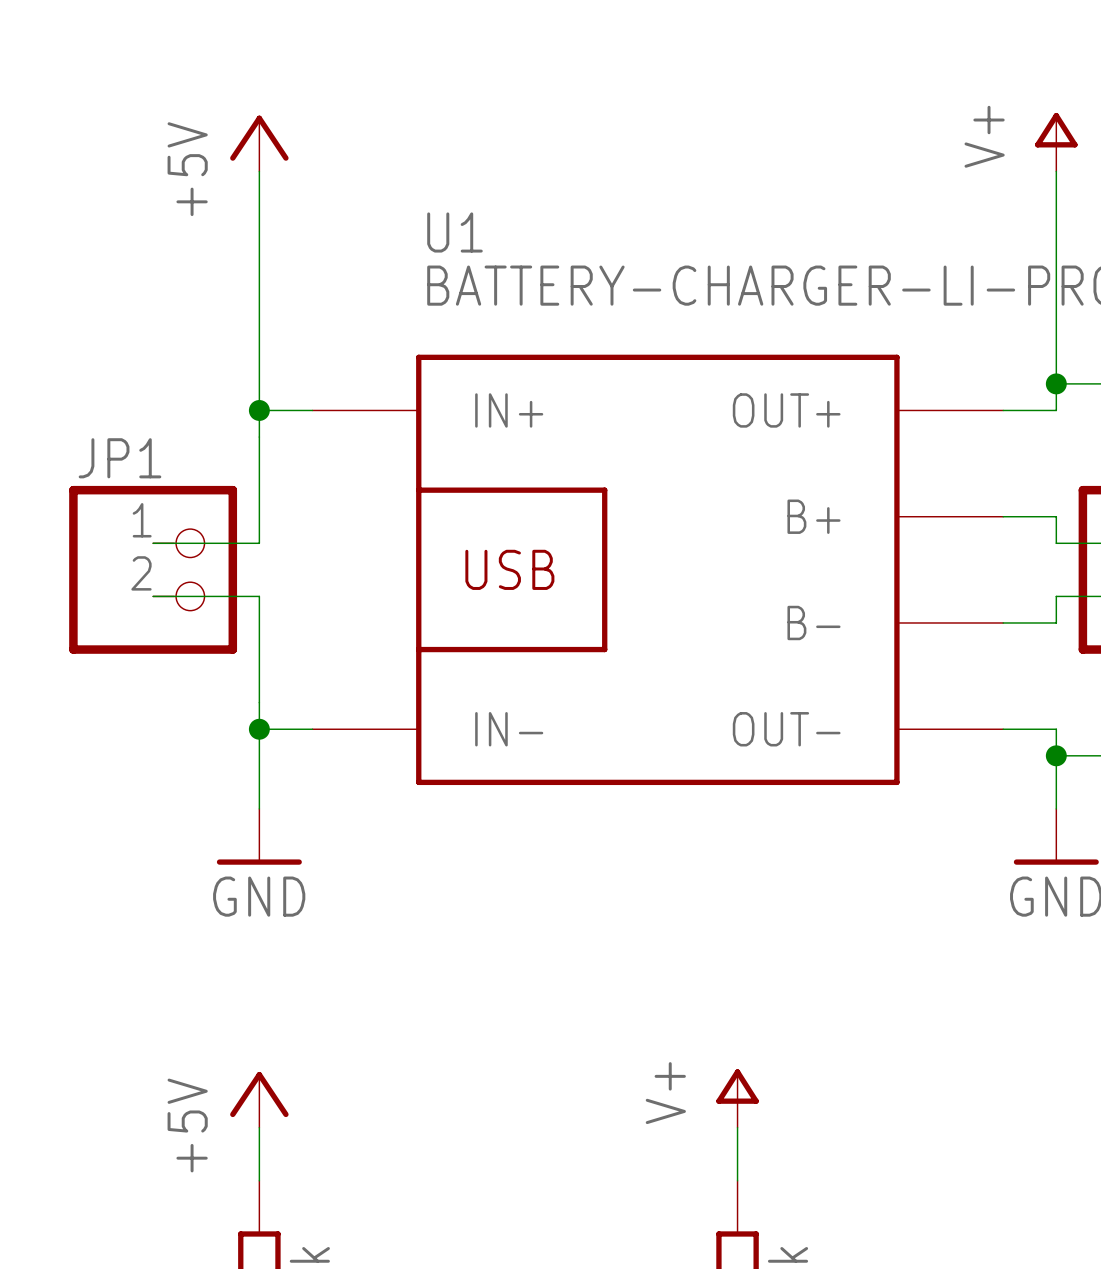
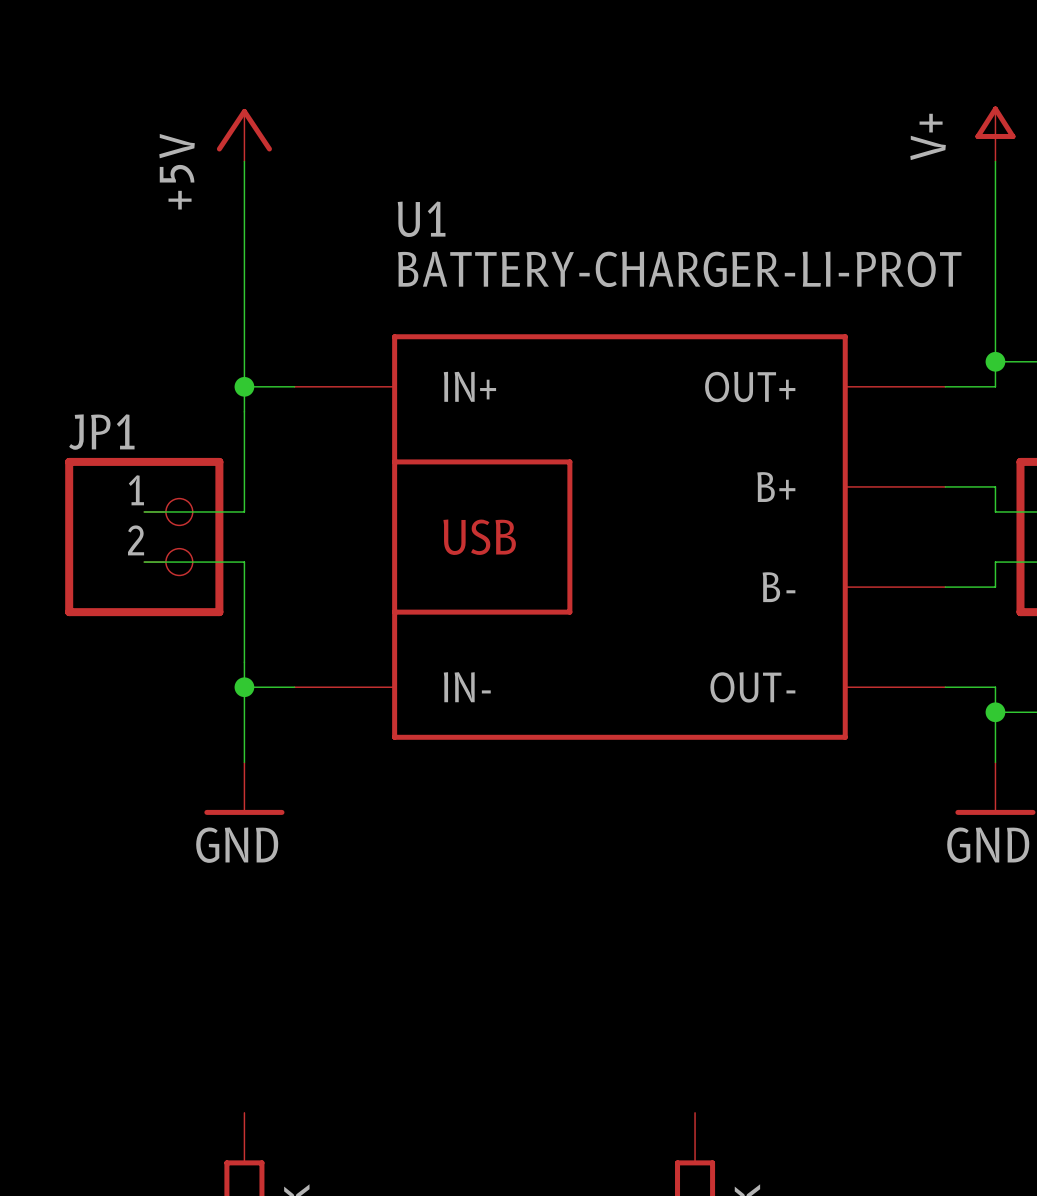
power symbol: V+ (737, 1098) -> none
power symbol: +5V (259, 1099) -> none
wire: (259, 1127) (259, 1180) -> none
wire: (737, 1127) (737, 1180) -> none

